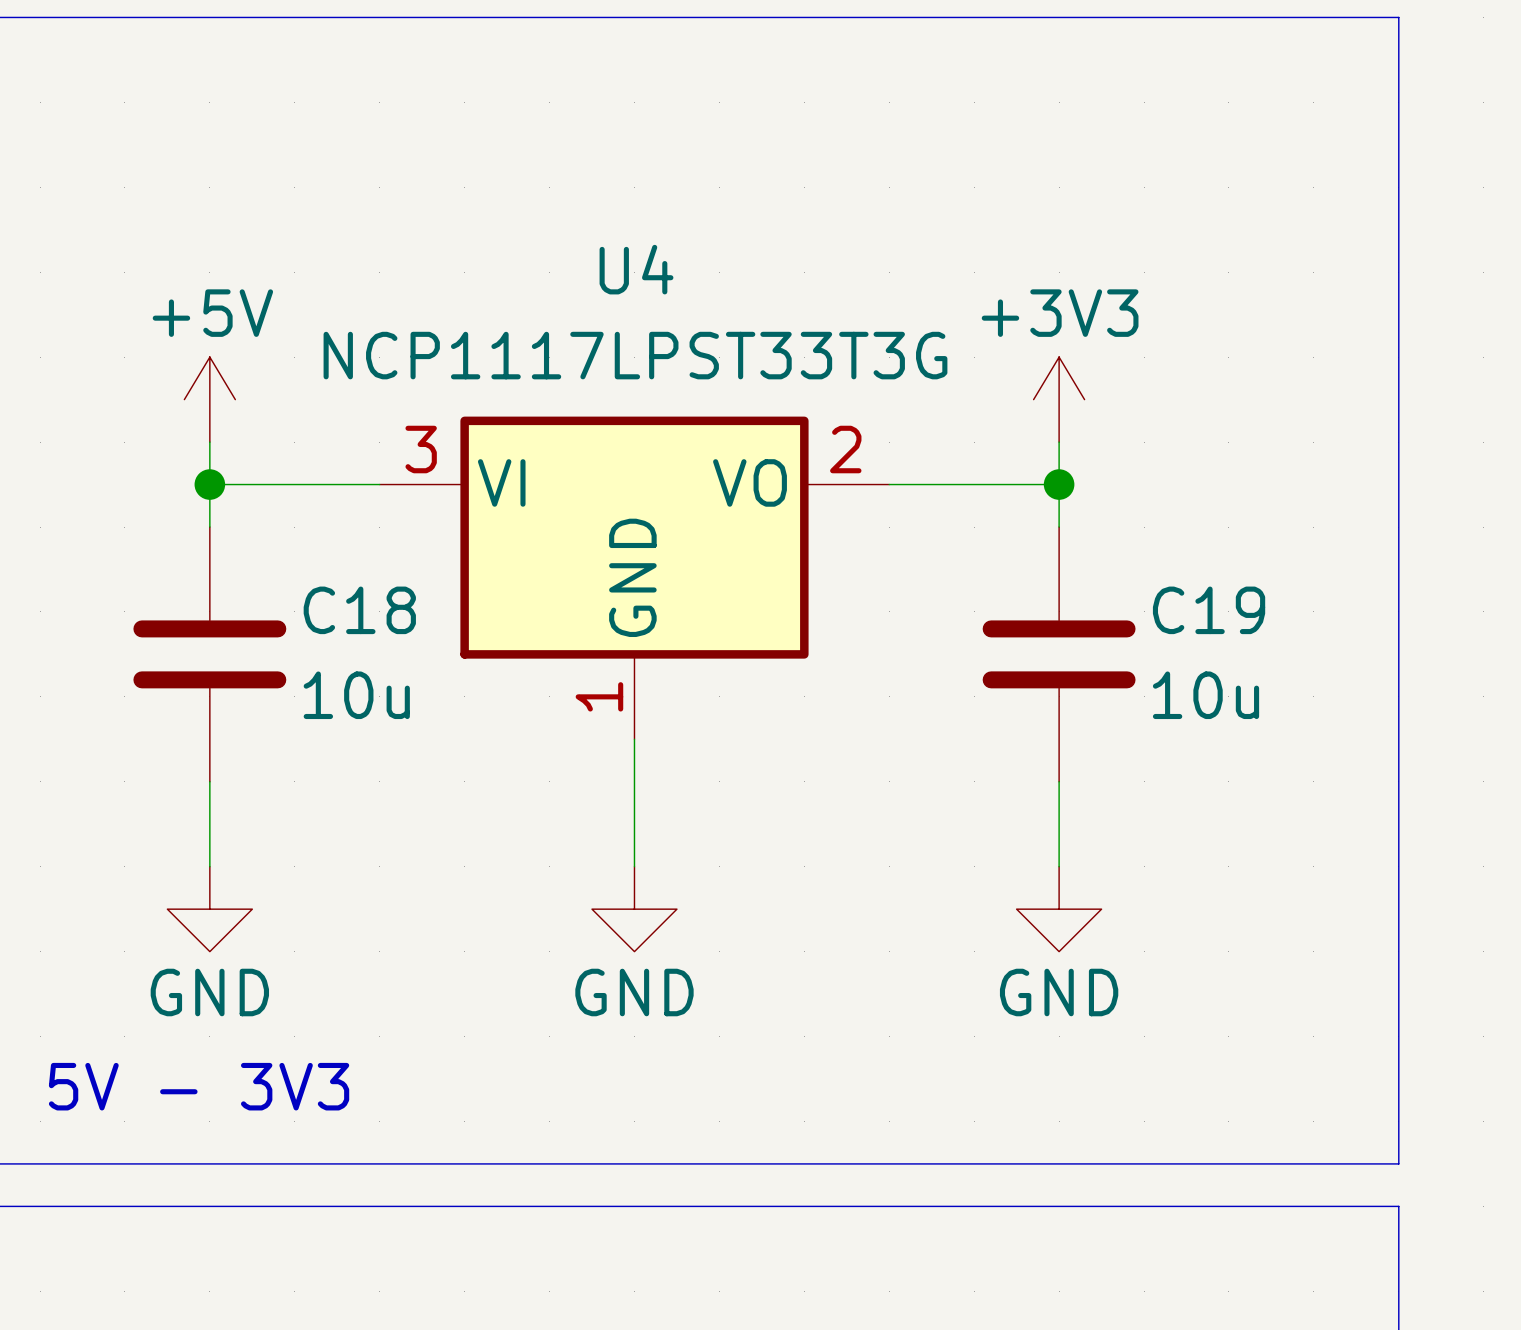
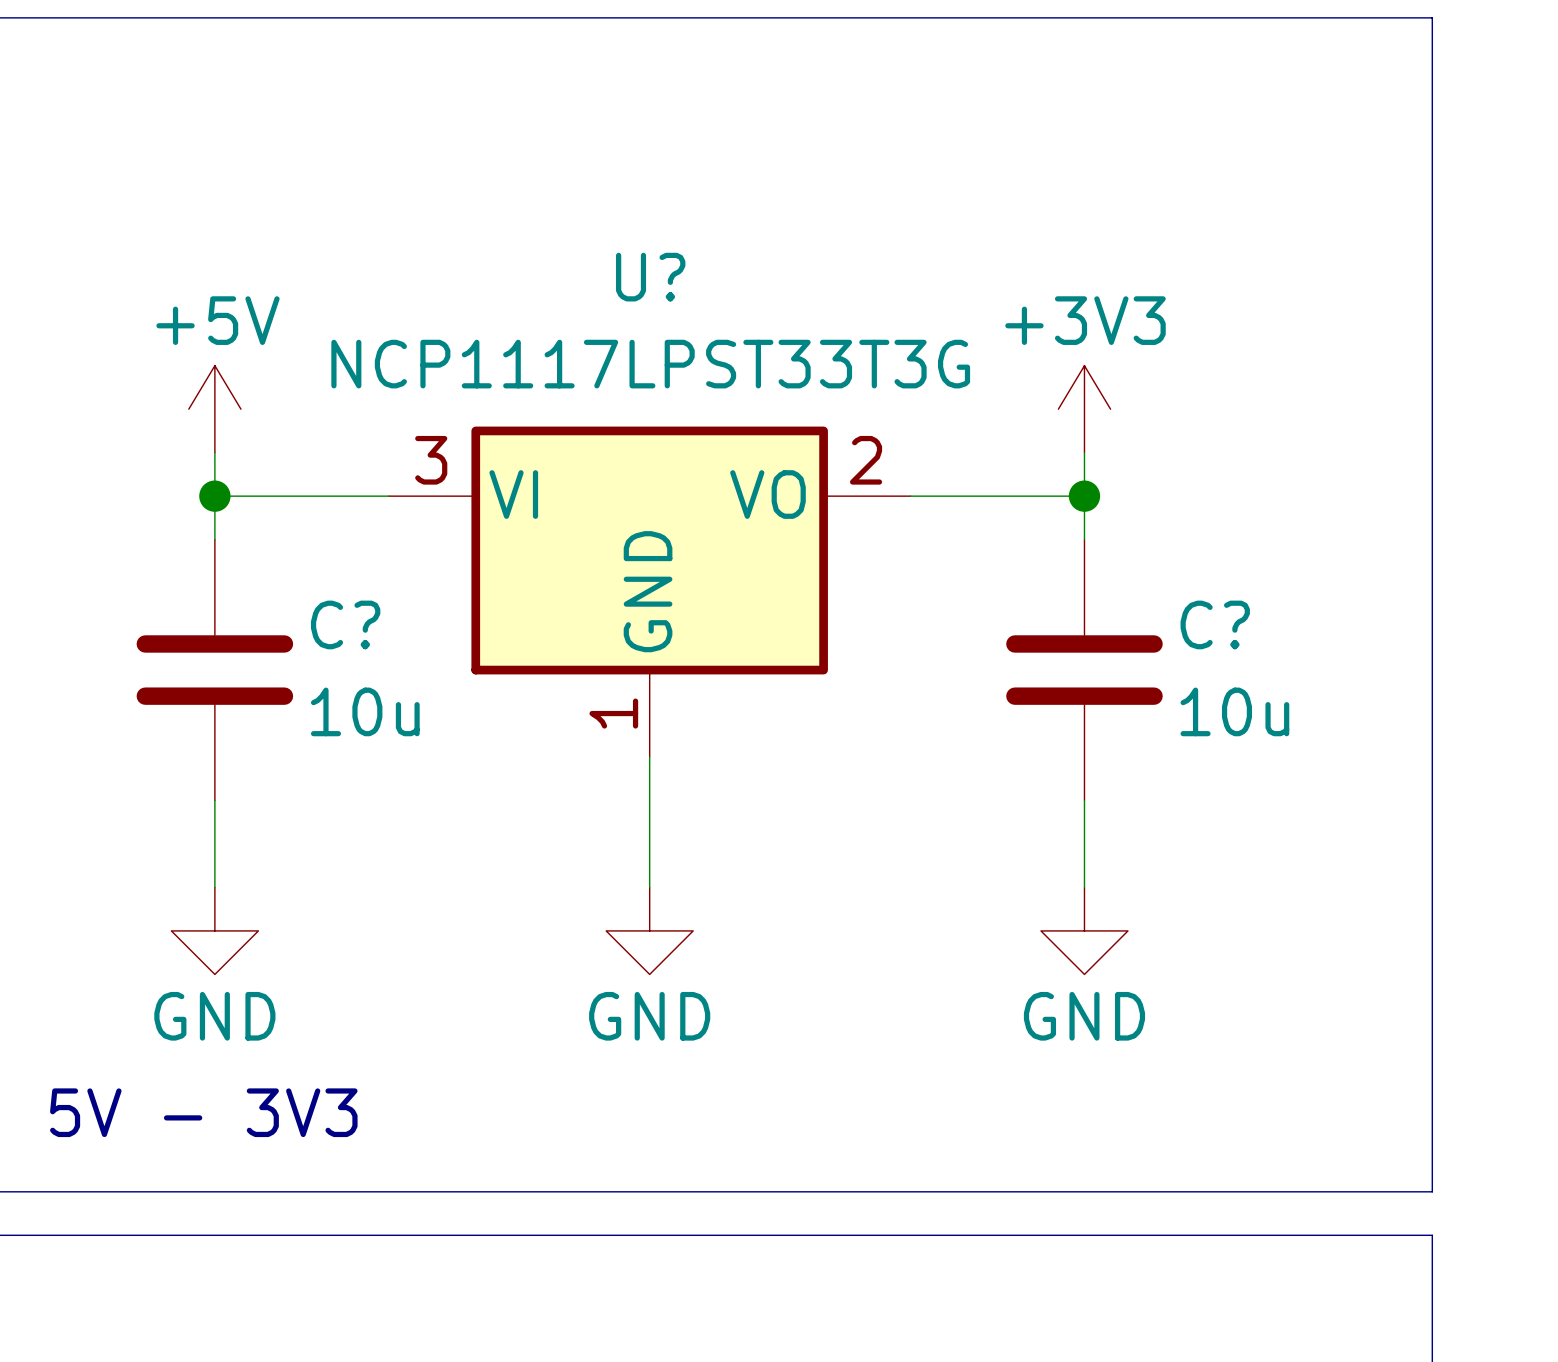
U4 name: U4 (636, 269) -> U? (650, 277)
C18 name: C18 (359, 610) -> C? (345, 624)
C19 name: C19 (1209, 610) -> C? (1215, 624)

